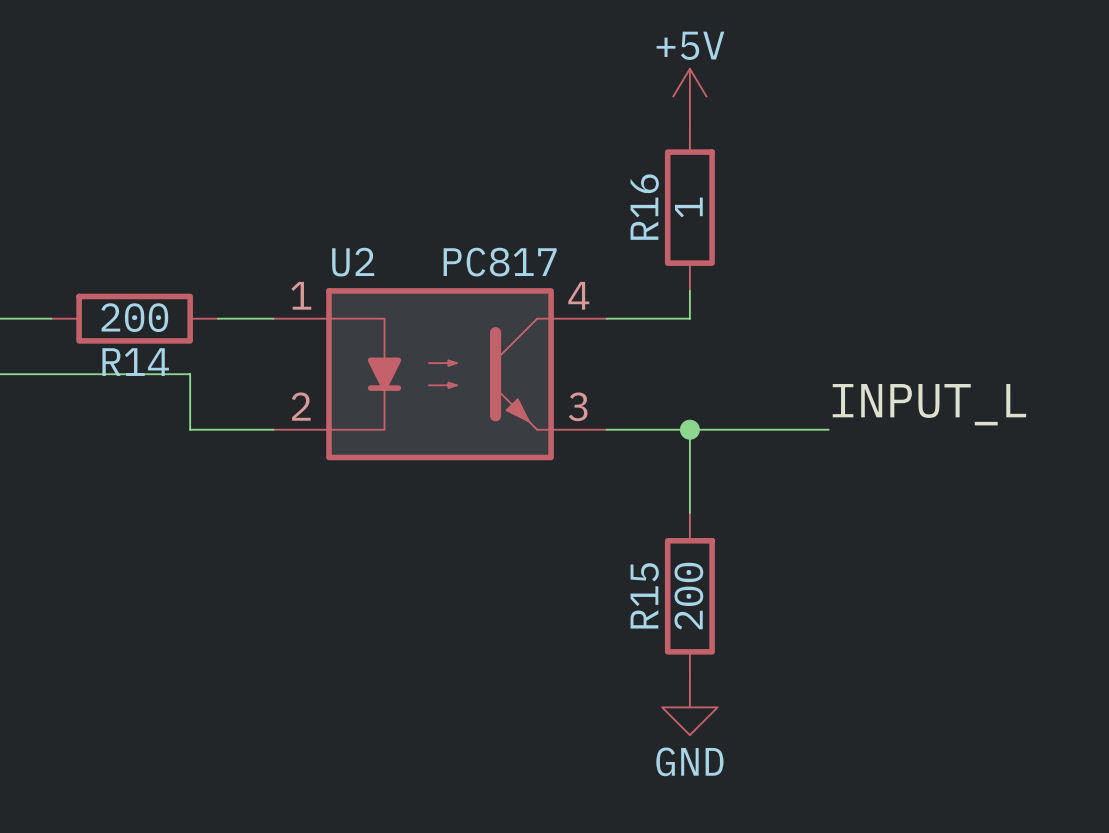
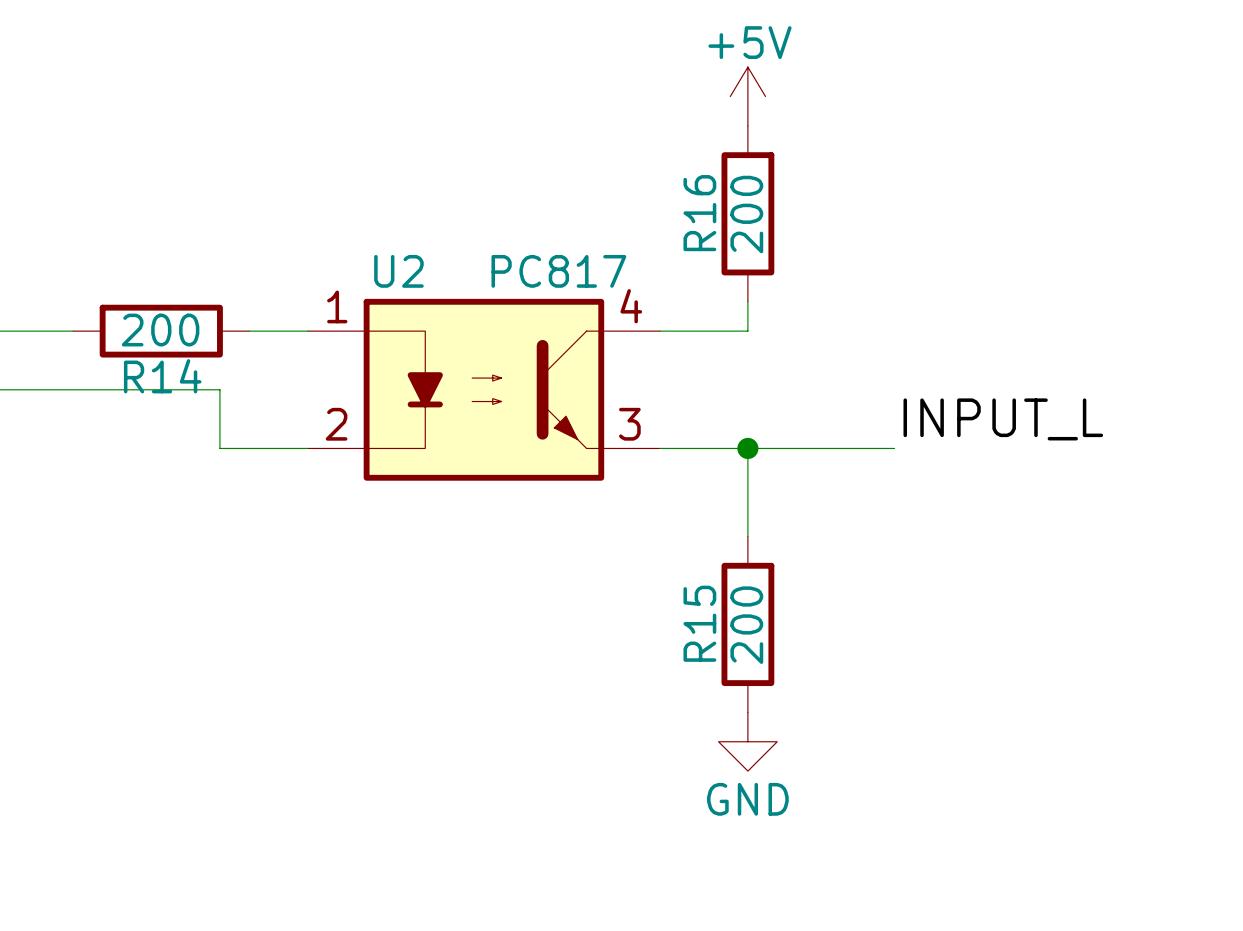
R16 value: 1 (688, 207) -> 200 (746, 214)

